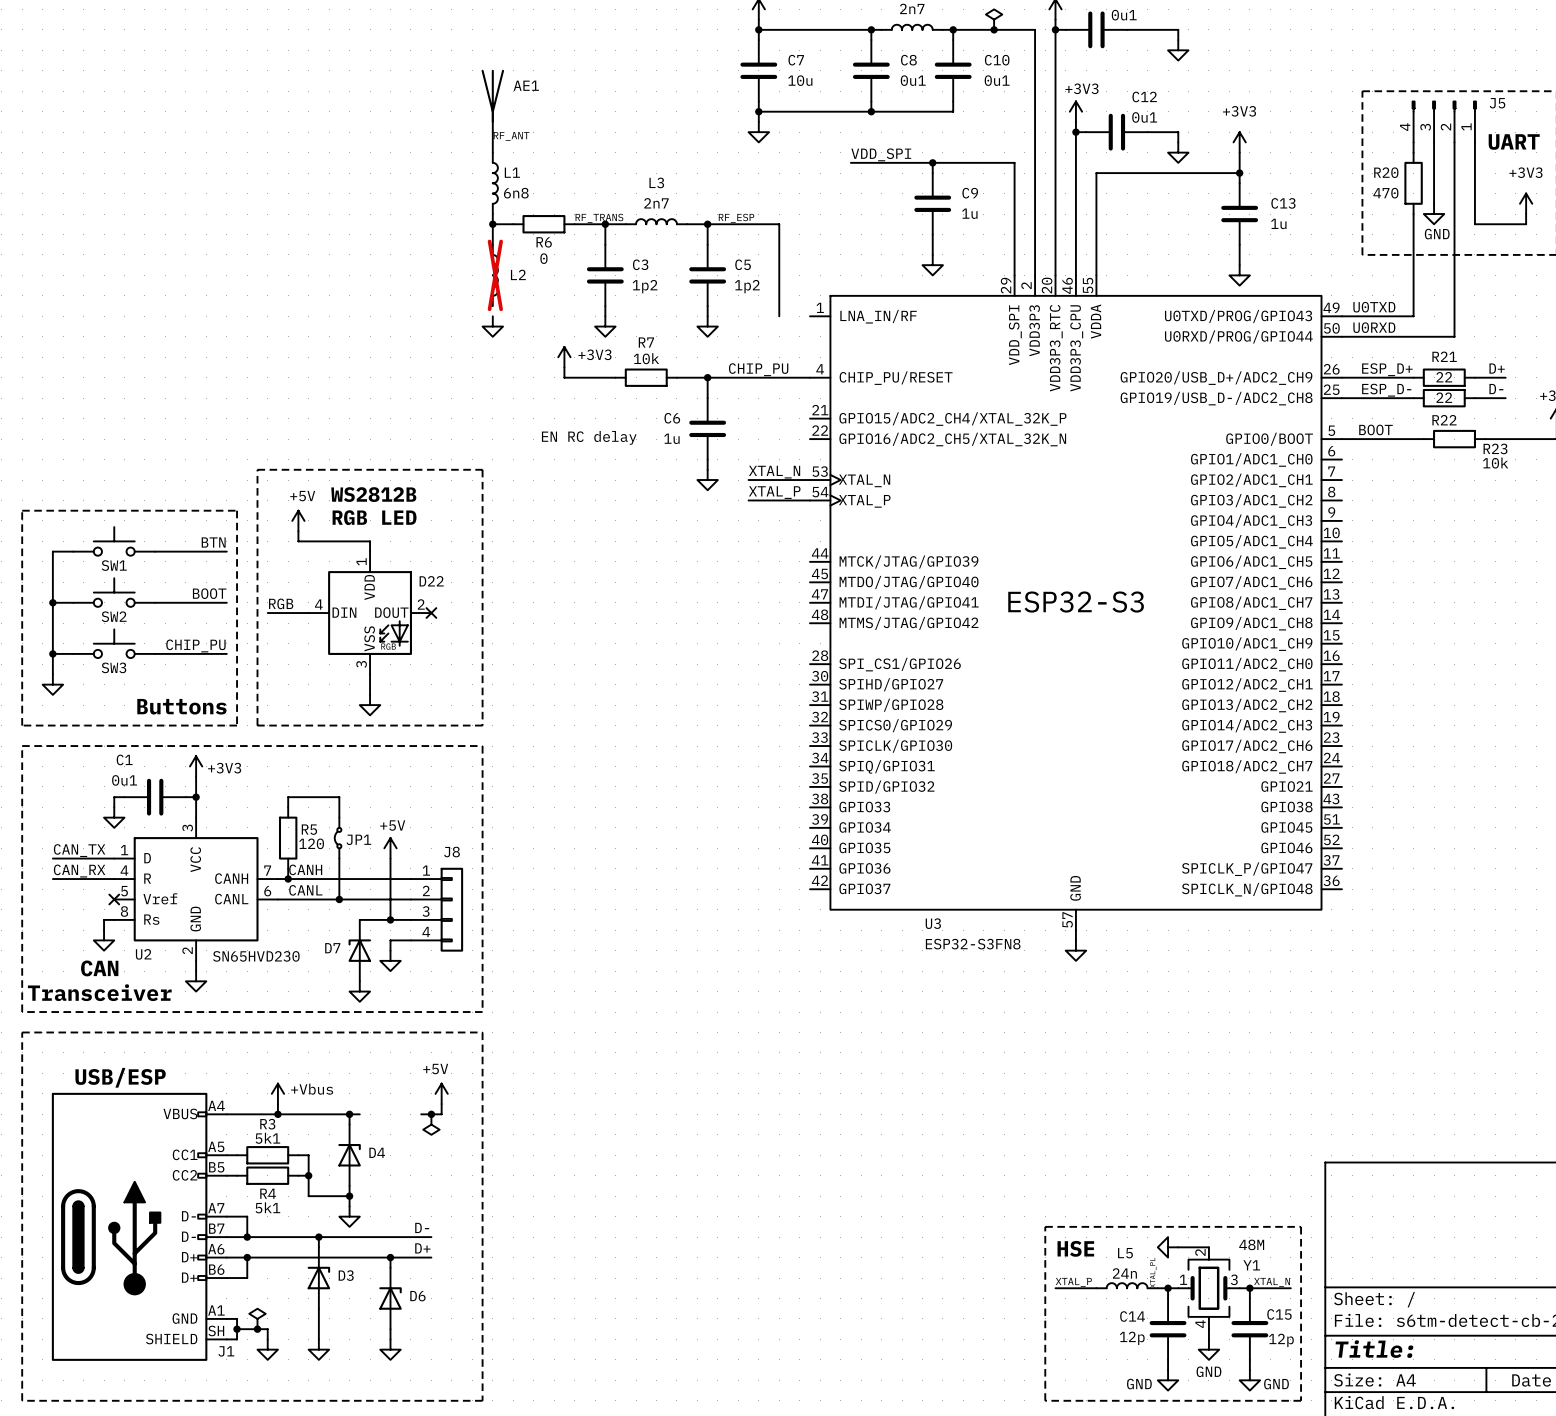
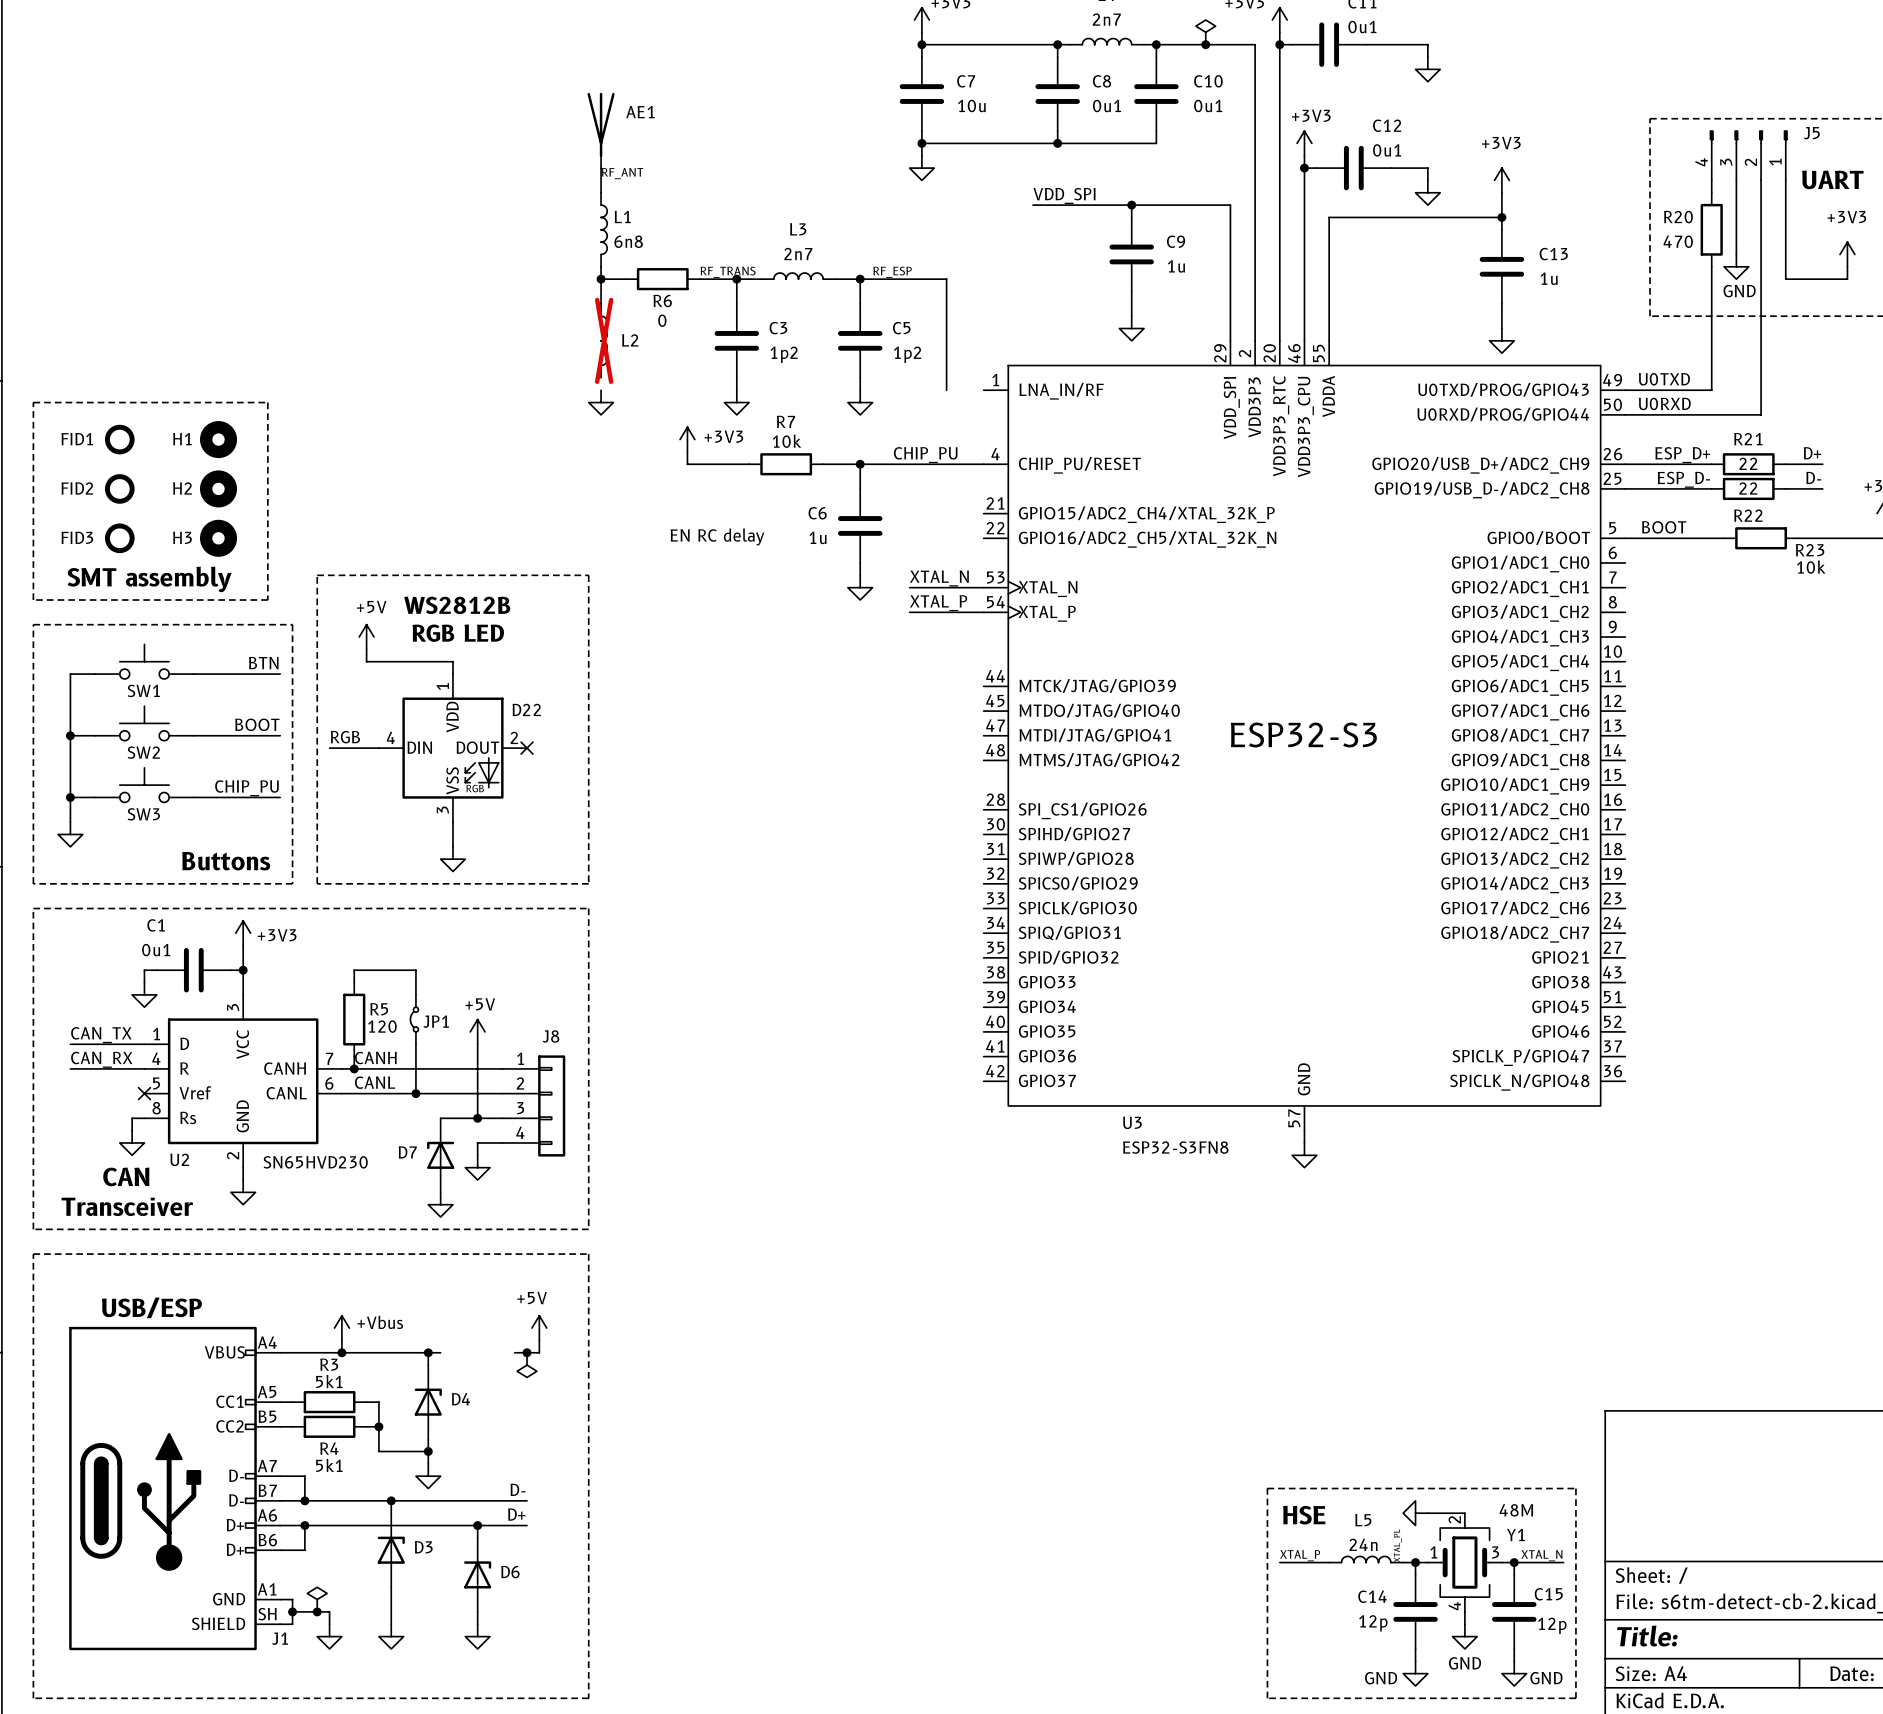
line: none -> (33, 402) (267, 402) (267, 600) (33, 600) (33, 402)
FID1: none -> (119, 439)
H1: none -> (218, 439)
FID2: none -> (119, 488)
H2: none -> (218, 488)
FID3: none -> (119, 538)
H3: none -> (218, 538)
text: none -> SMT assembly (149, 579)

